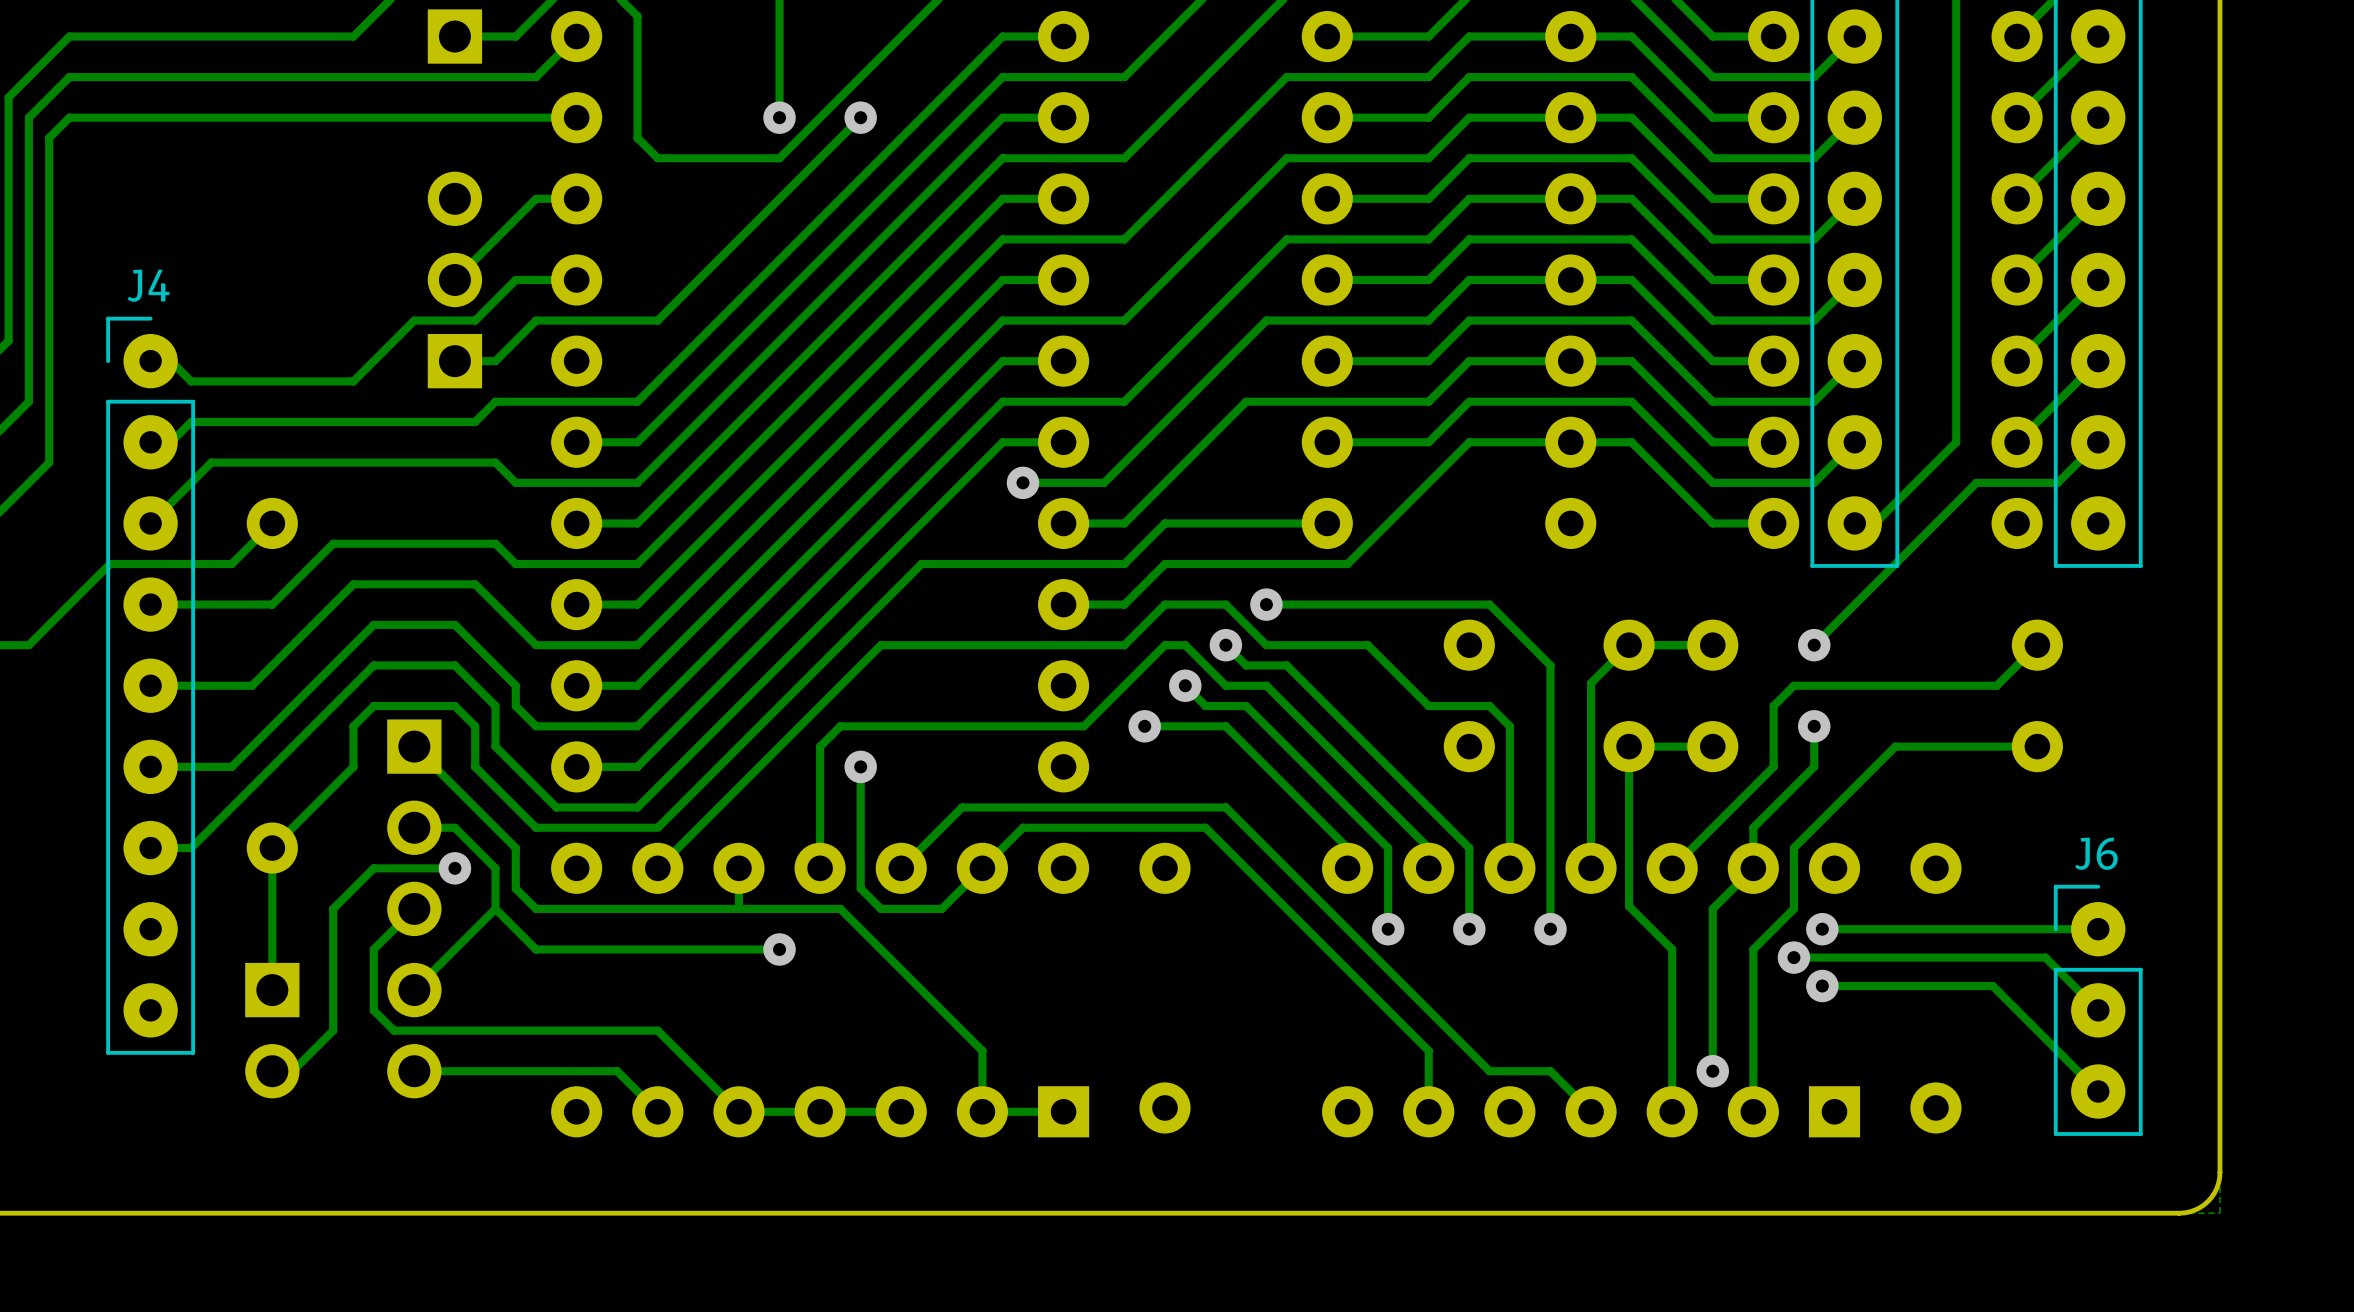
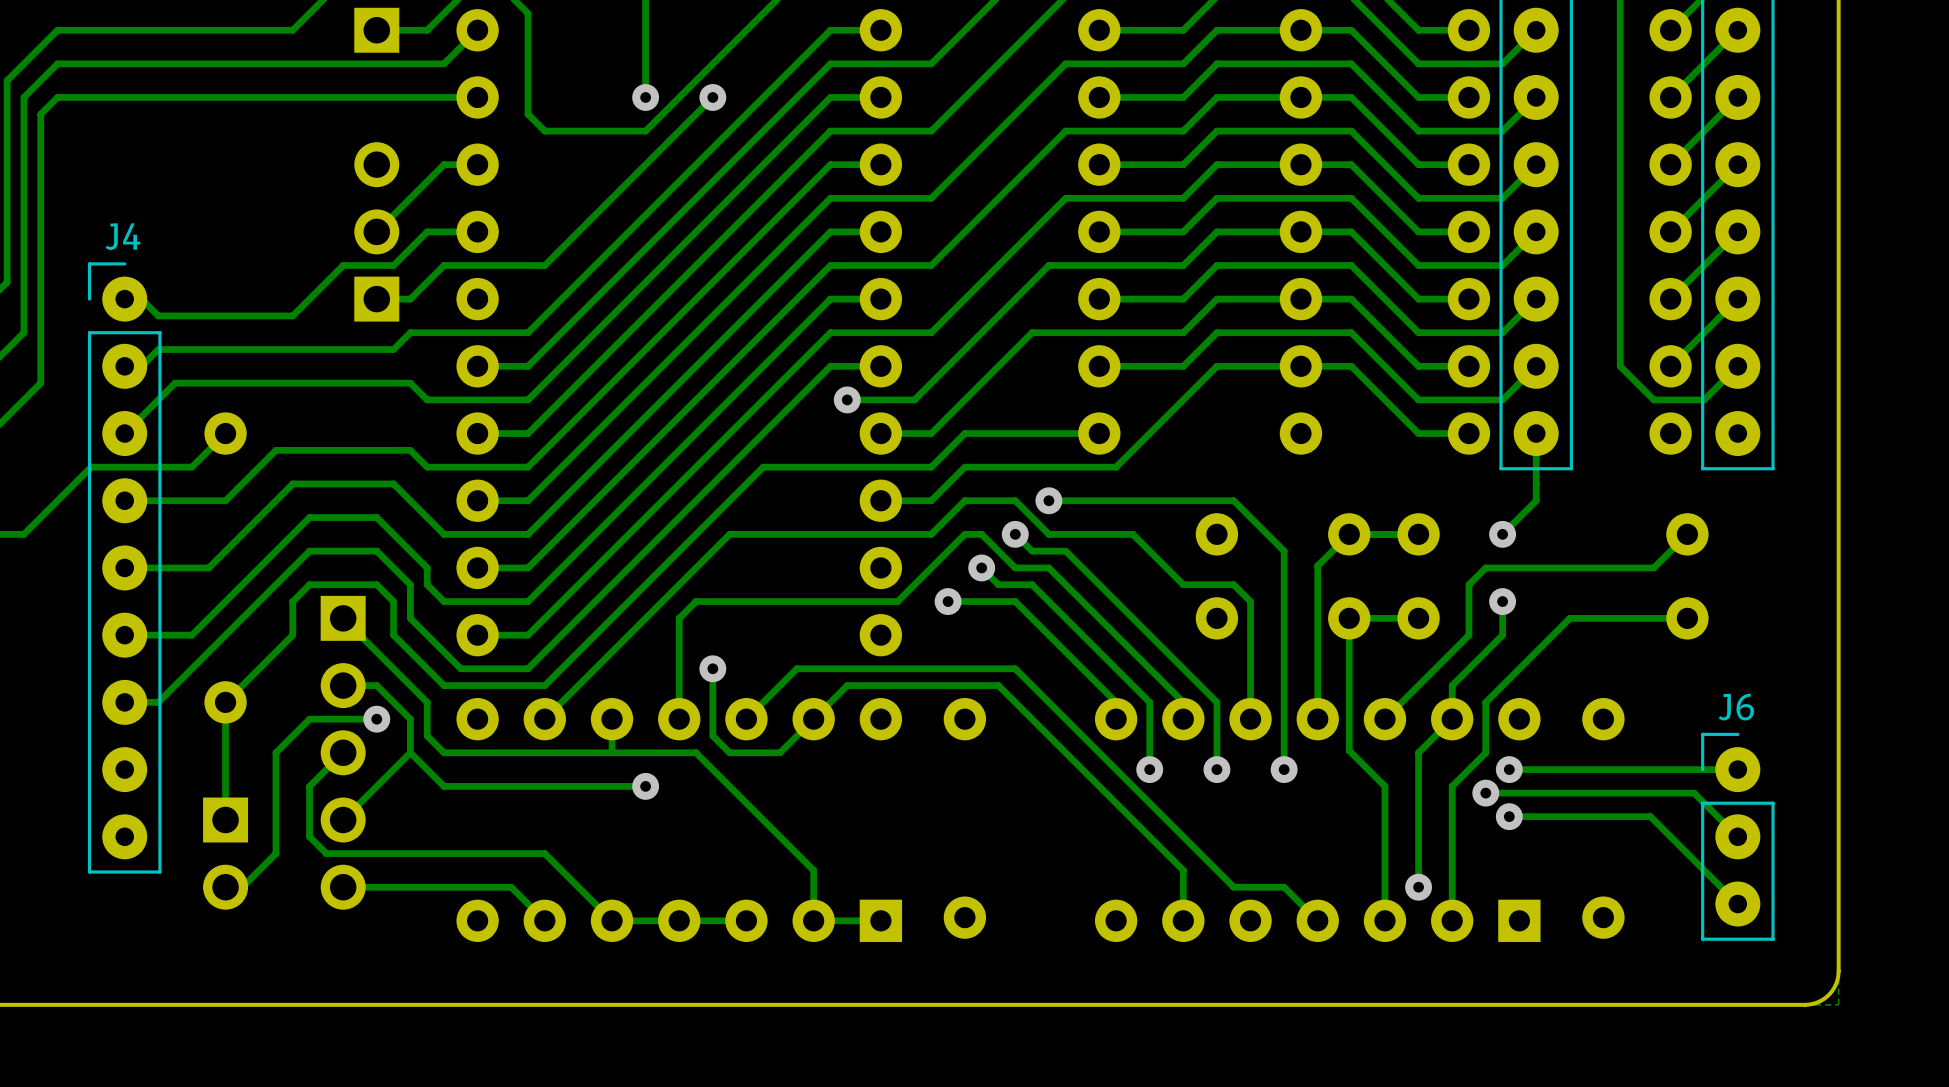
track: (1956, 442) (1875, 523) (1854, 523) -> (1620, 366) (1653, 399)
track: (1996, 482) (1976, 482) (1854, 604) -> (1536, 433) (1536, 500)
track: (860, 766) (860, 807) -> none
via position: (860, 766) -> (712, 668)

